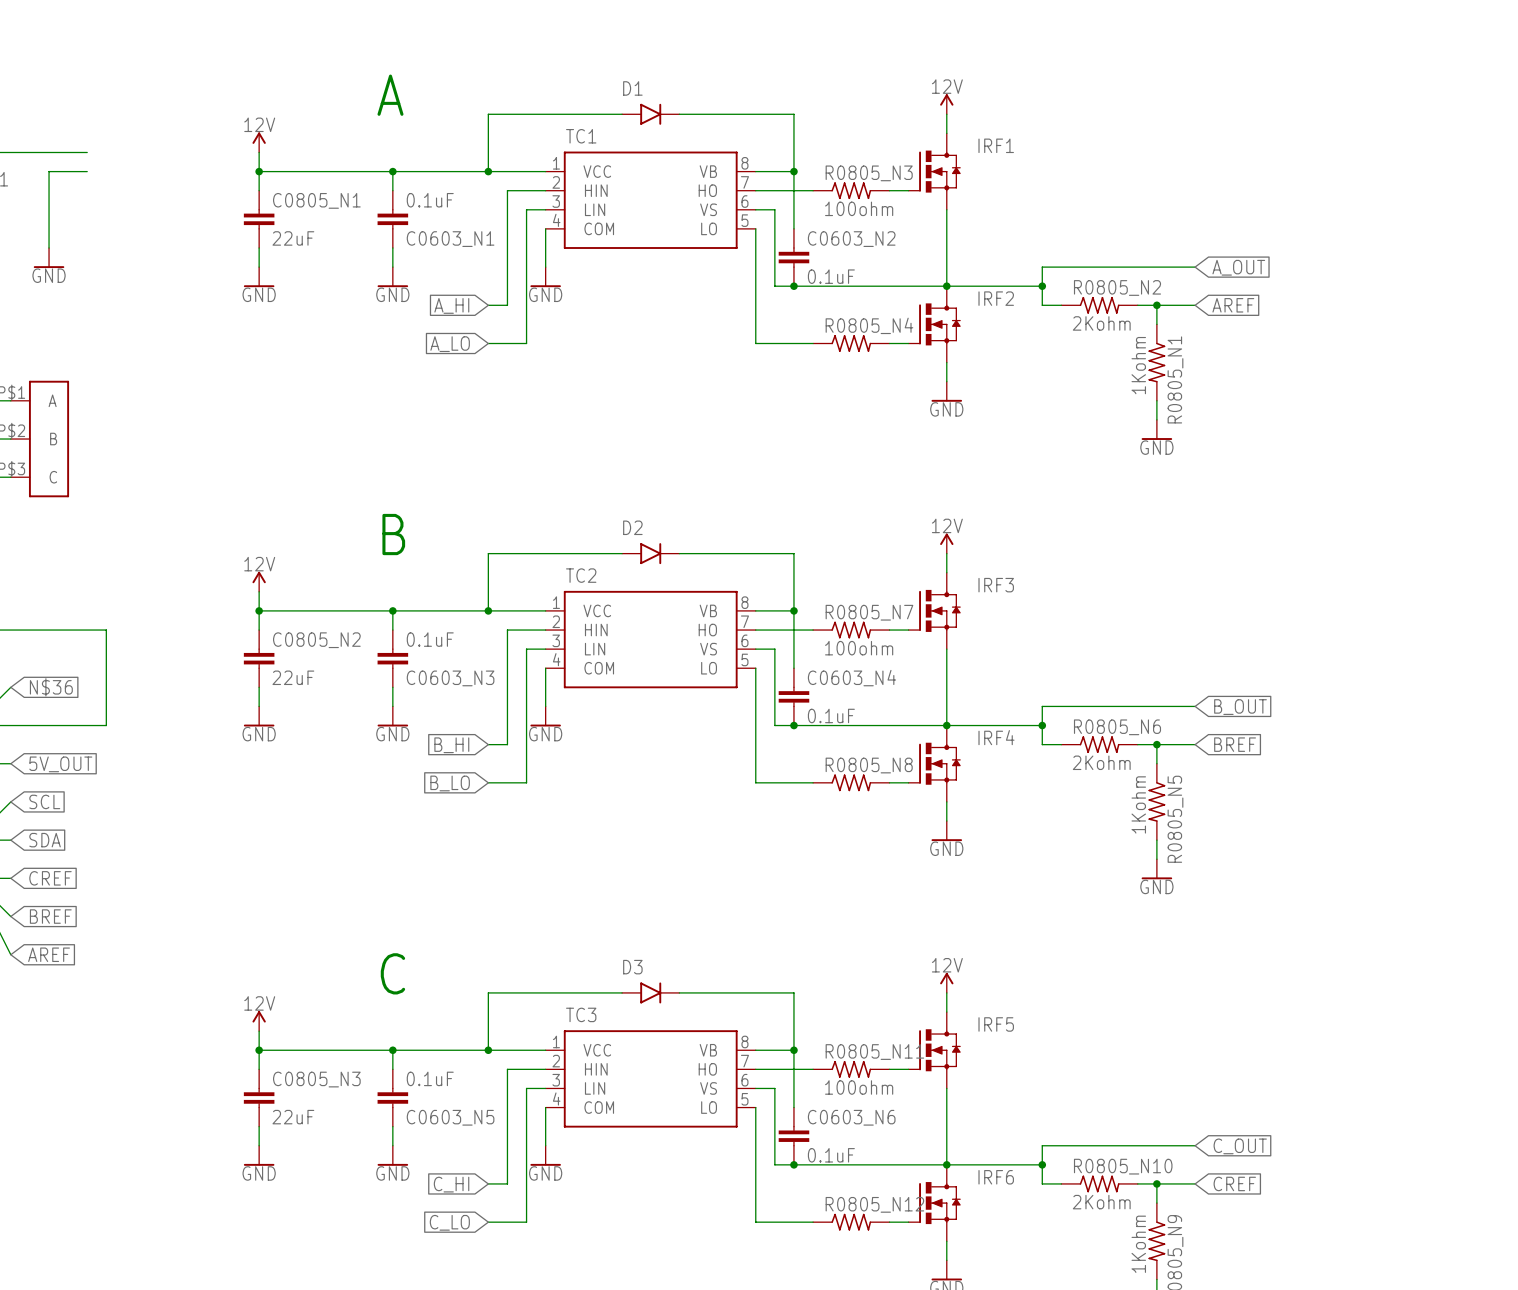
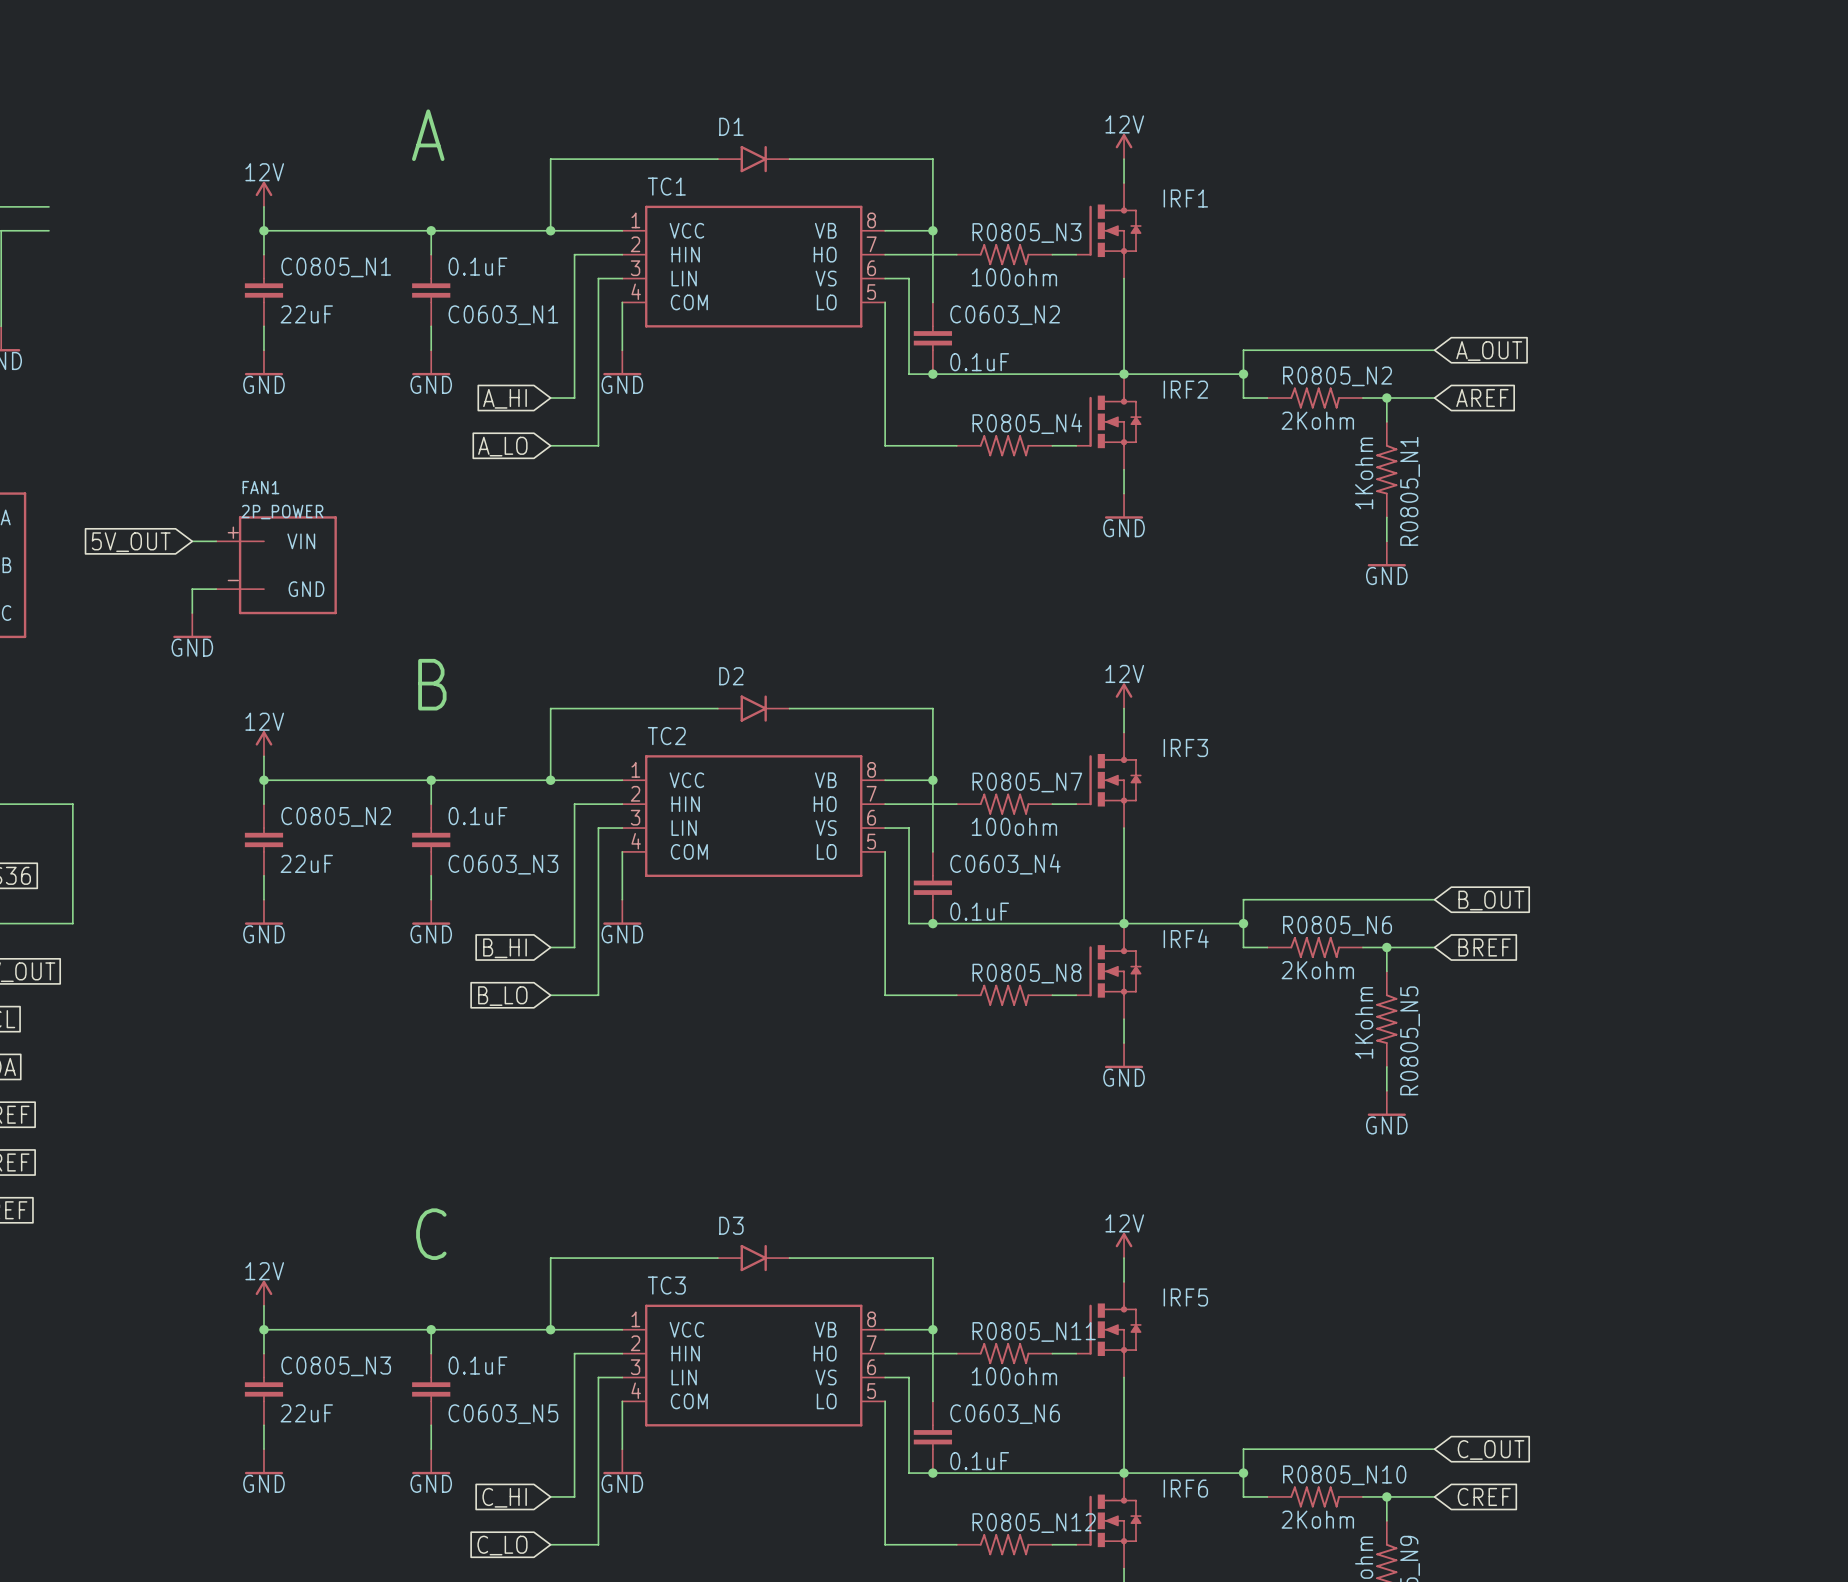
wire: none -> (192, 541) (216, 541)
global label: none -> 5V_OUT (131, 542)
FAN1: none -> 2P_POWER (276, 565)
wire: none -> (216, 589) (192, 589) (192, 613)
power symbol: none -> GND (192, 625)

